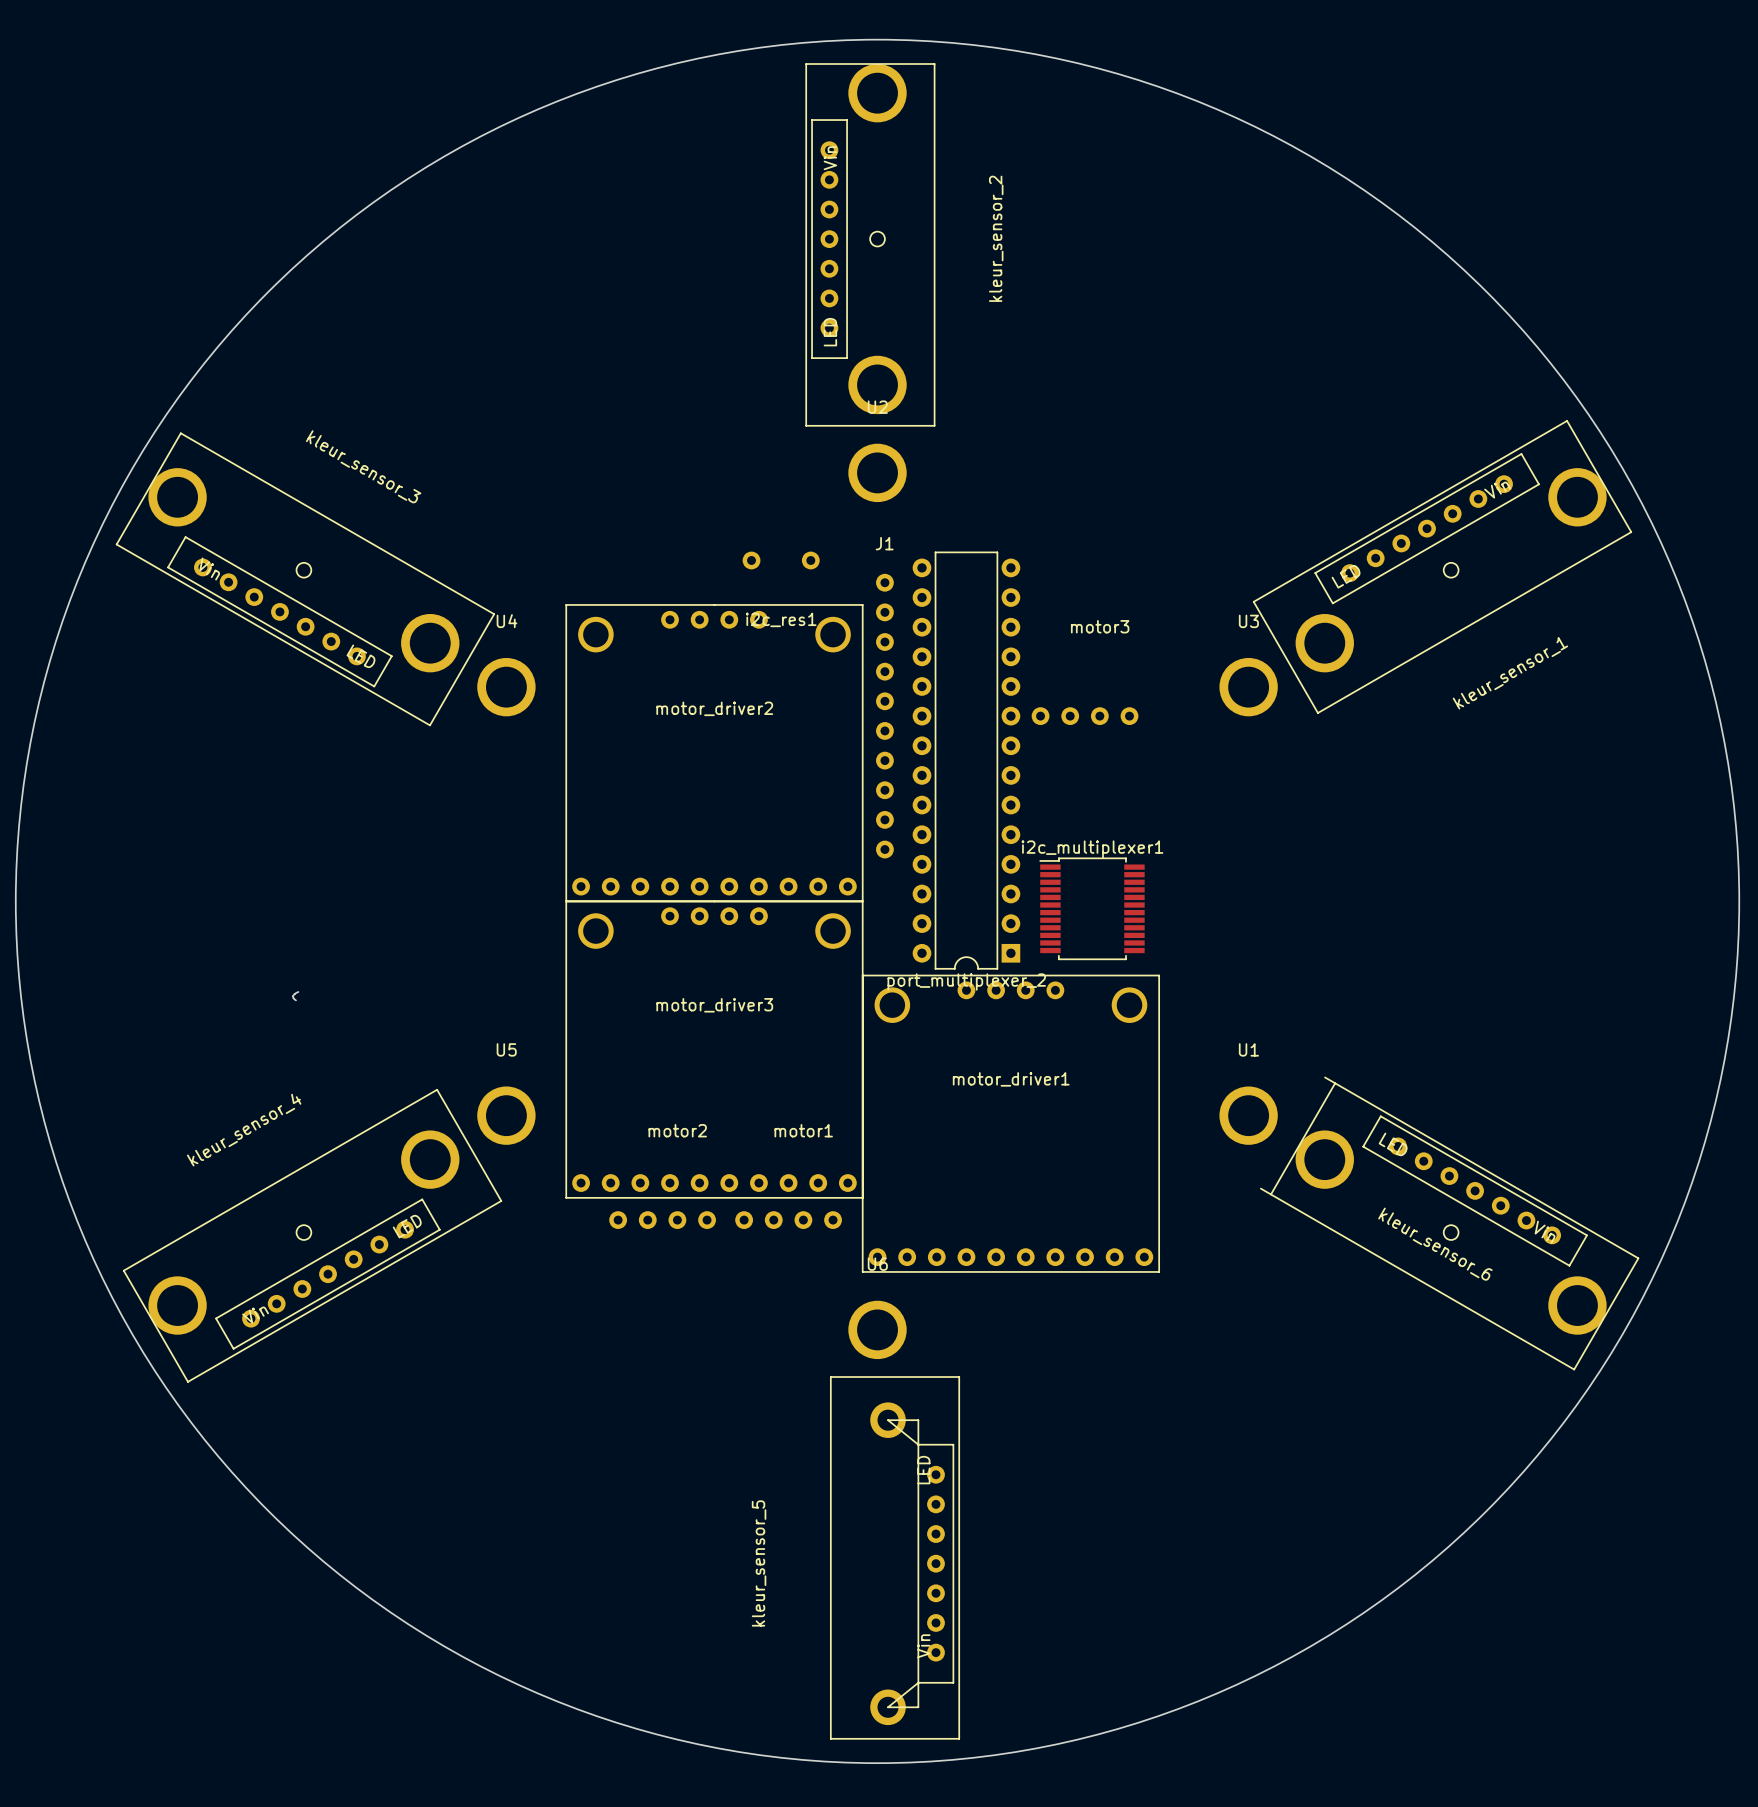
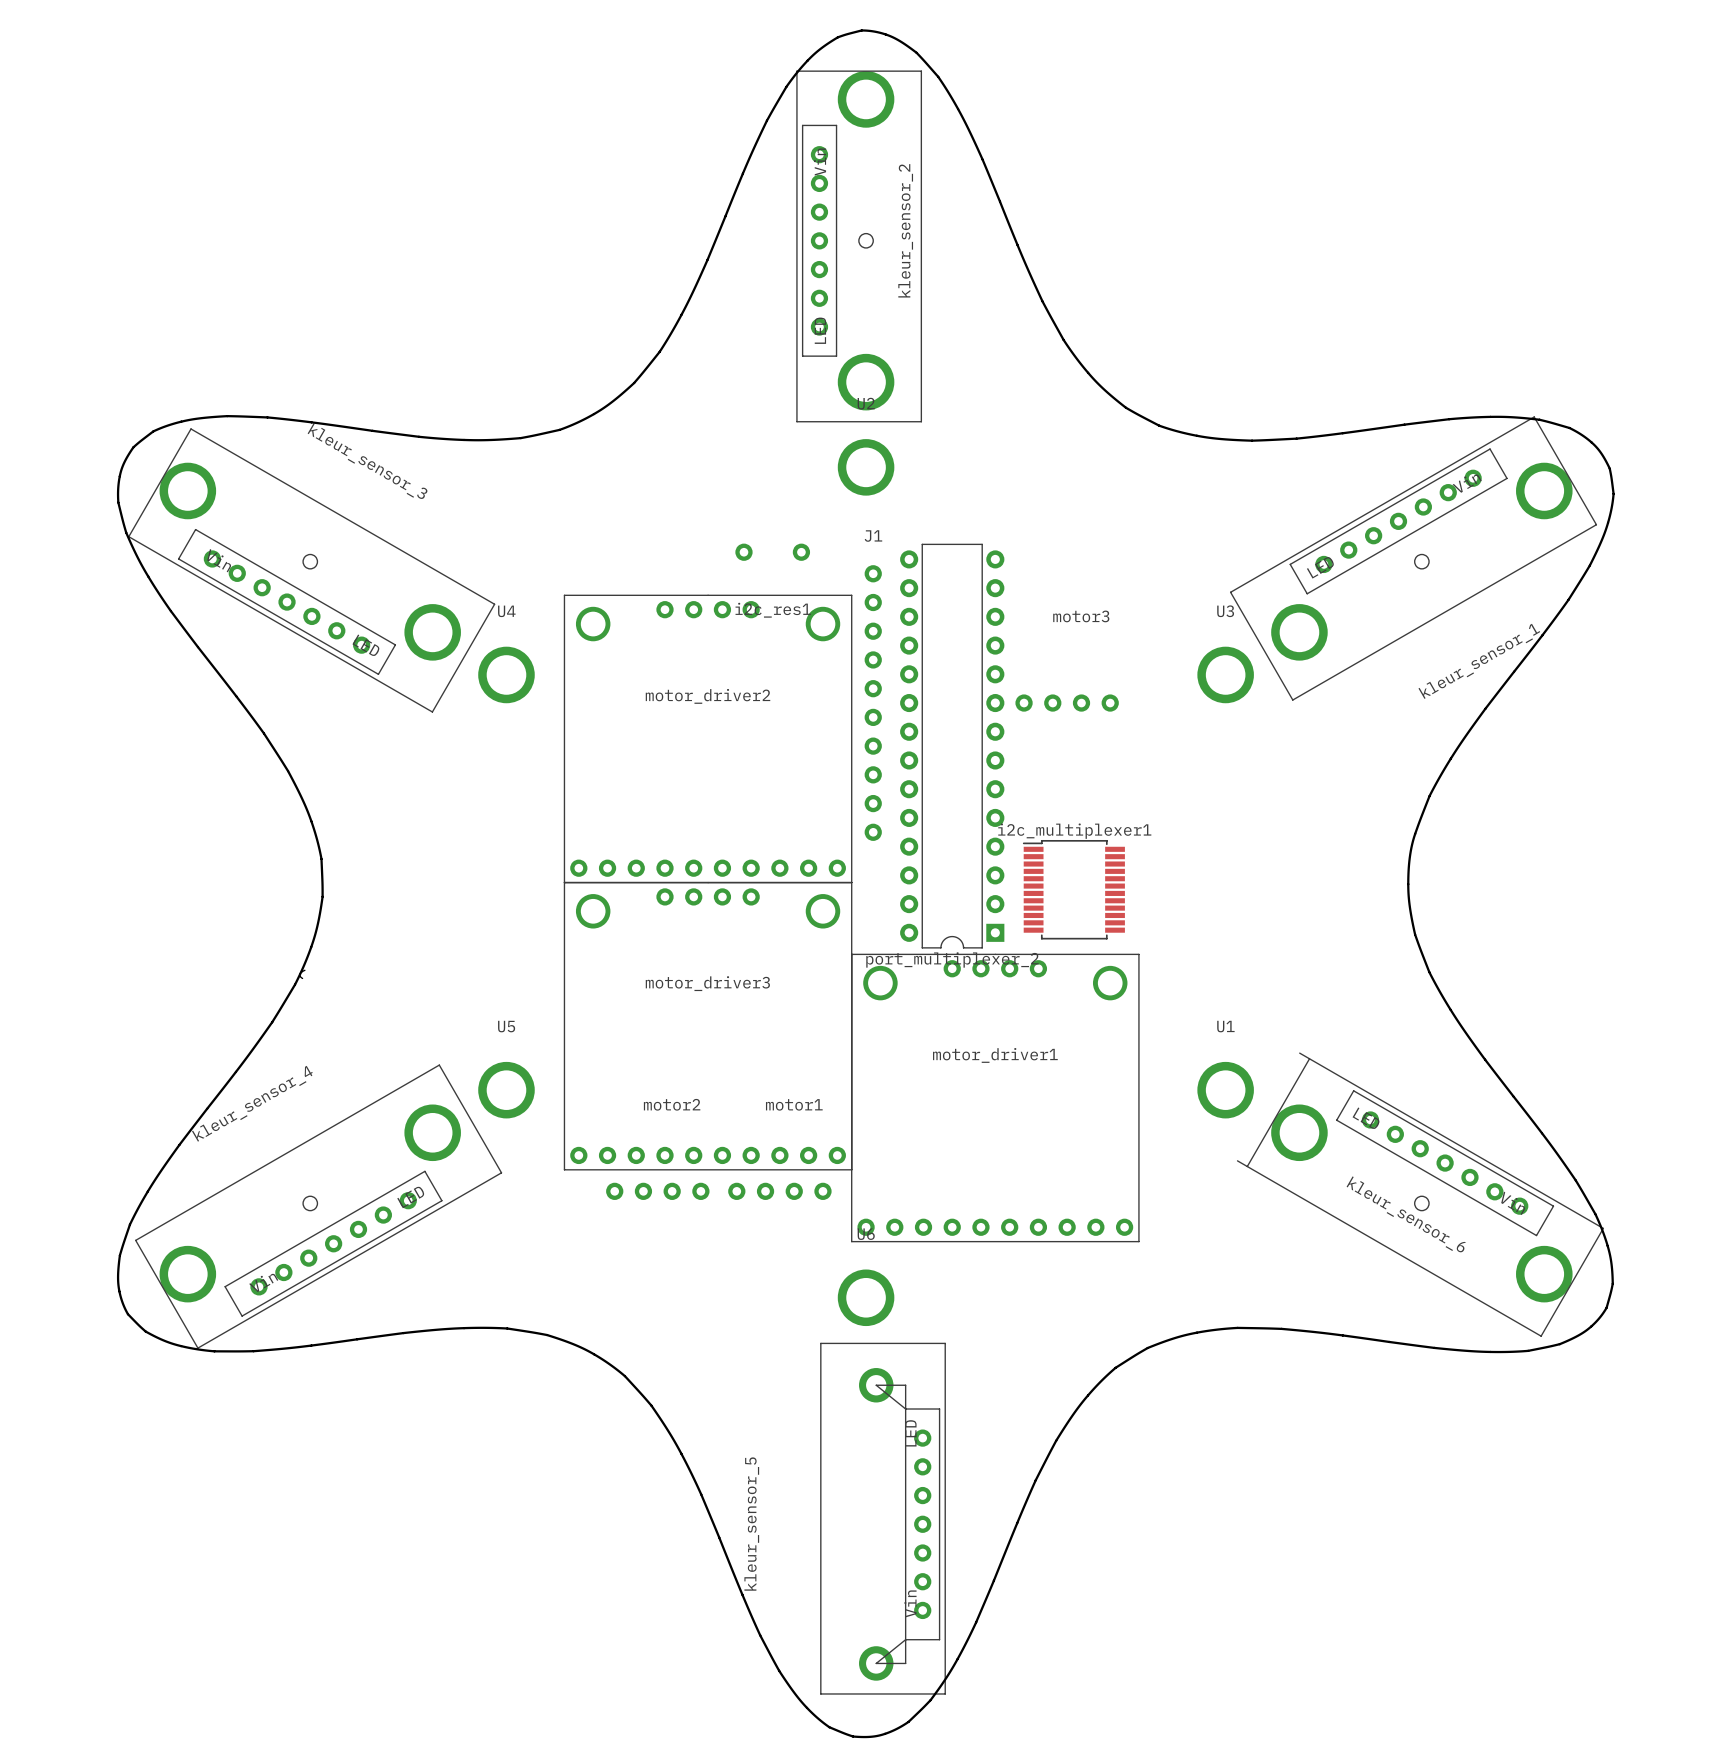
board edge: none -> (861, 30) (837, 37) (821, 48) (804, 63) (786, 86) (758, 137) (701, 274) (670, 333) (659, 351) (634, 383) (594, 414) (559, 429) (520, 438) (481, 440) (418, 436) (267, 417) (207, 417) (179, 422) (153, 431) (133, 447) (127, 456) (120, 473) (118, 495) (122, 519) (129, 540) (144, 570) (166, 604) (258, 726) (288, 771) (305, 806) (316, 837) (321, 859) (322, 896) (313, 939) (295, 984) (263, 1034) (179, 1144) (147, 1191) (129, 1224) (119, 1255) (118, 1277) (119, 1293) (125, 1308) (141, 1327) (165, 1341) (195, 1348) (214, 1351) (253, 1351) (423, 1330) (491, 1327) (547, 1335) (575, 1345) (598, 1356) (624, 1376) (641, 1394) (651, 1405) (674, 1441) (701, 1494) (760, 1635) (788, 1684) (806, 1707) (827, 1726) (853, 1736) (863, 1737) (882, 1734) (902, 1725) (921, 1709) (935, 1693) (953, 1665) (972, 1629) (1032, 1488) (1056, 1440) (1078, 1407) (1099, 1382) (1115, 1367) (1145, 1349) (1187, 1334) (1237, 1327) (1306, 1331) (1461, 1350) (1528, 1350) (1559, 1344) (1577, 1335) (1593, 1324) (1605, 1309) (1612, 1283) (1611, 1266) (1607, 1243) (1596, 1216) (1567, 1168) (1475, 1046) (1438, 988) (1429, 972) (1415, 934) (1409, 904) (1408, 881) (1413, 840) (1433, 789) (1468, 732) (1557, 615) (1584, 573) (1605, 530) (1613, 493) (1609, 468) (1594, 445) (1569, 427) (1539, 419) (1503, 416) (1459, 418) (1305, 437) (1252, 440) (1212, 438) (1180, 432) (1159, 425) (1125, 407) (1093, 378) (1063, 339) (1032, 279) (971, 134) (938, 76) (916, 52) (900, 41) (881, 33) (861, 30)
round board edge: [15, 39, 1740, 1764] -> none
kleur_sensor_2 name position: kleur_sensor_2 (996, 238) -> kleur_sensor_2 (905, 230)

